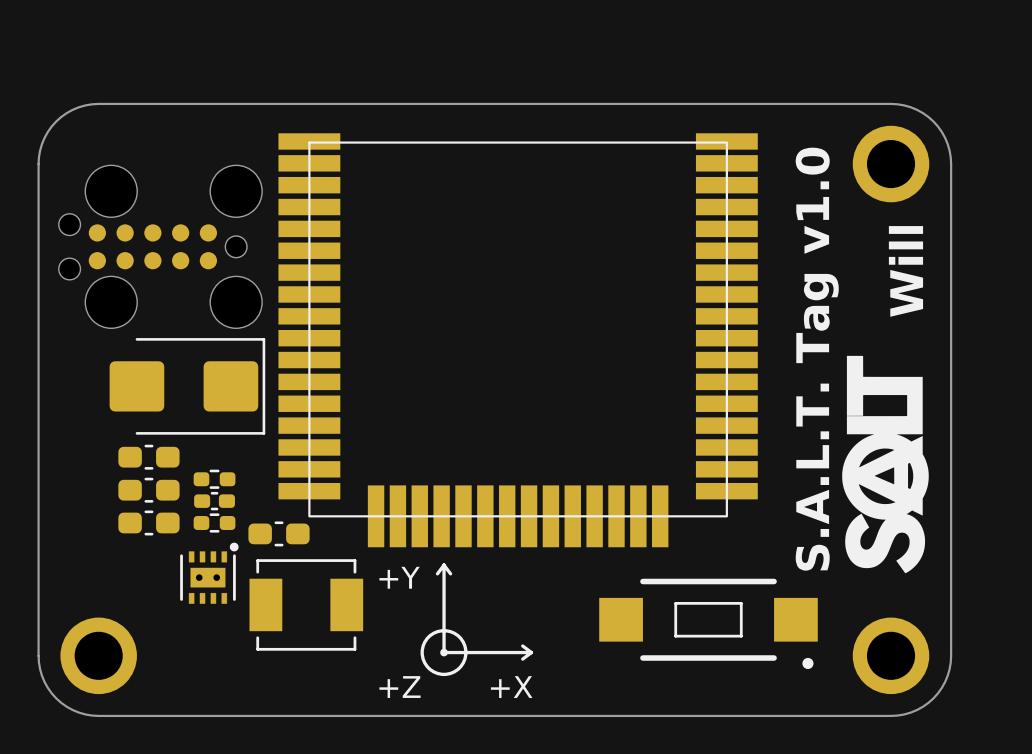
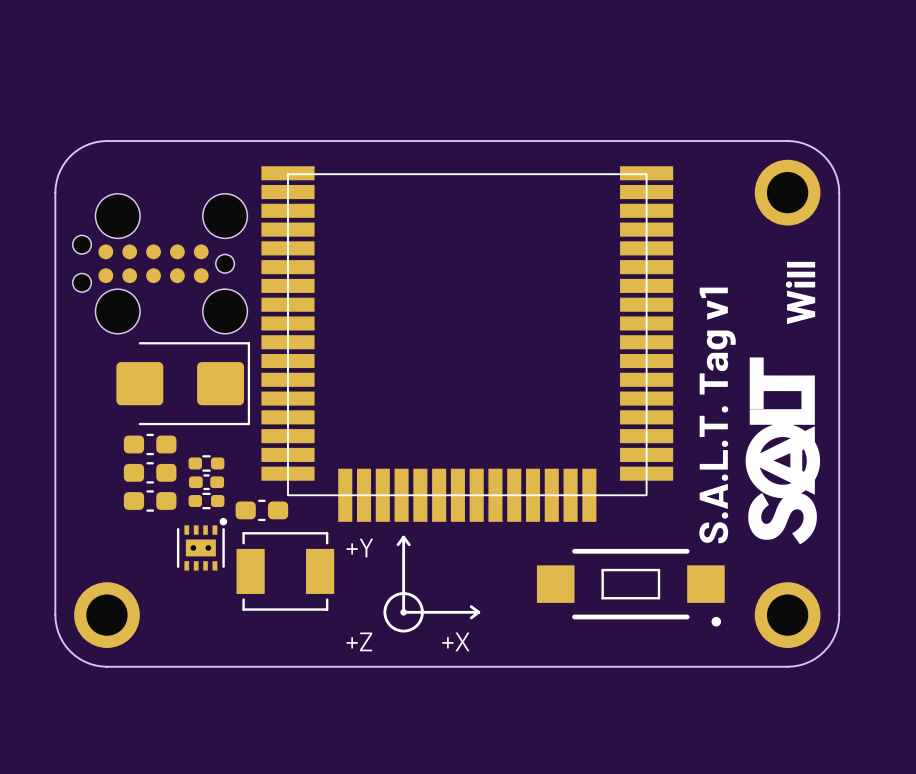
text: S.A.L.T. Tag v1.0 (817, 359) -> S.A.L.T. Tag v1 (717, 415)

